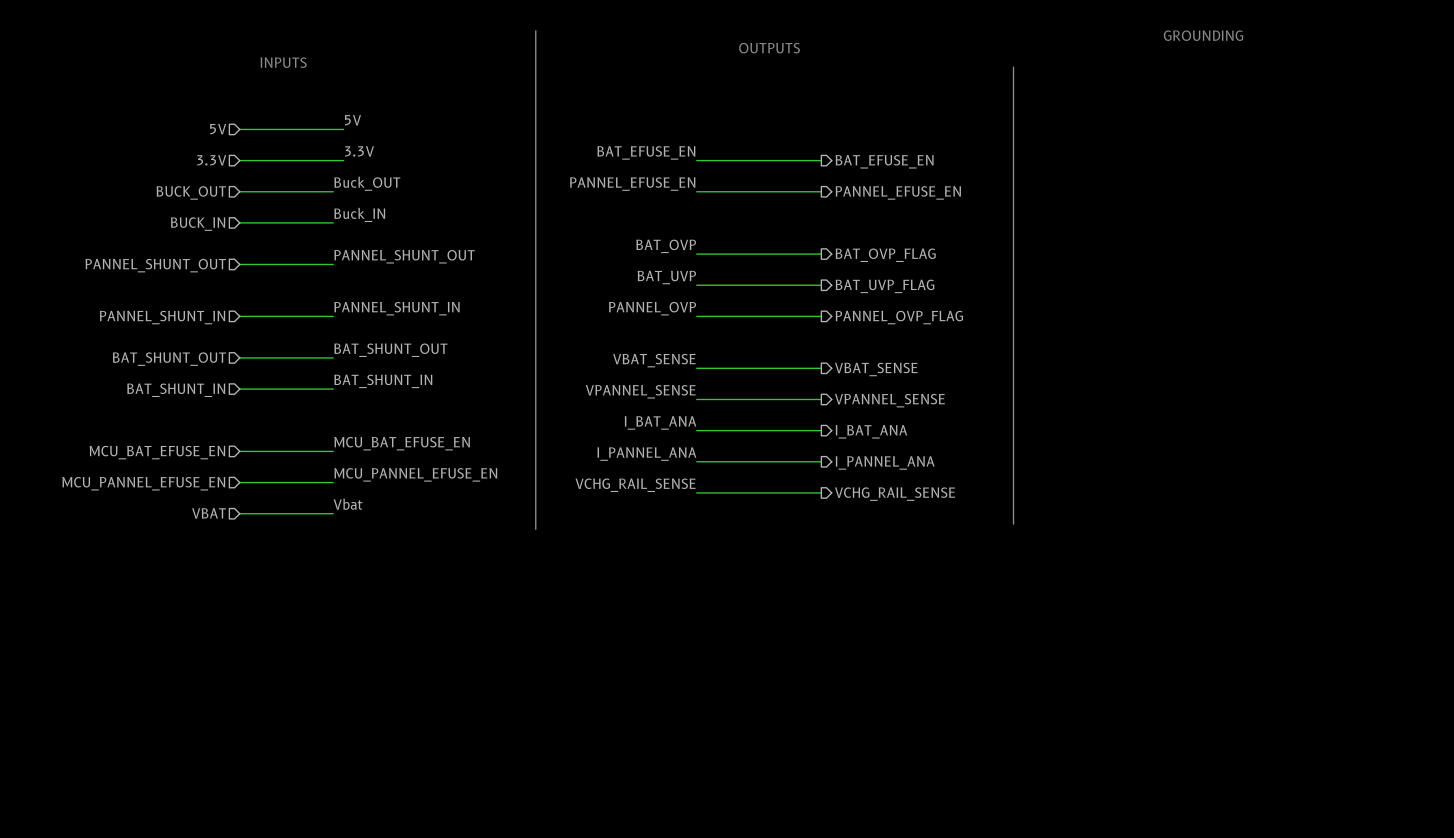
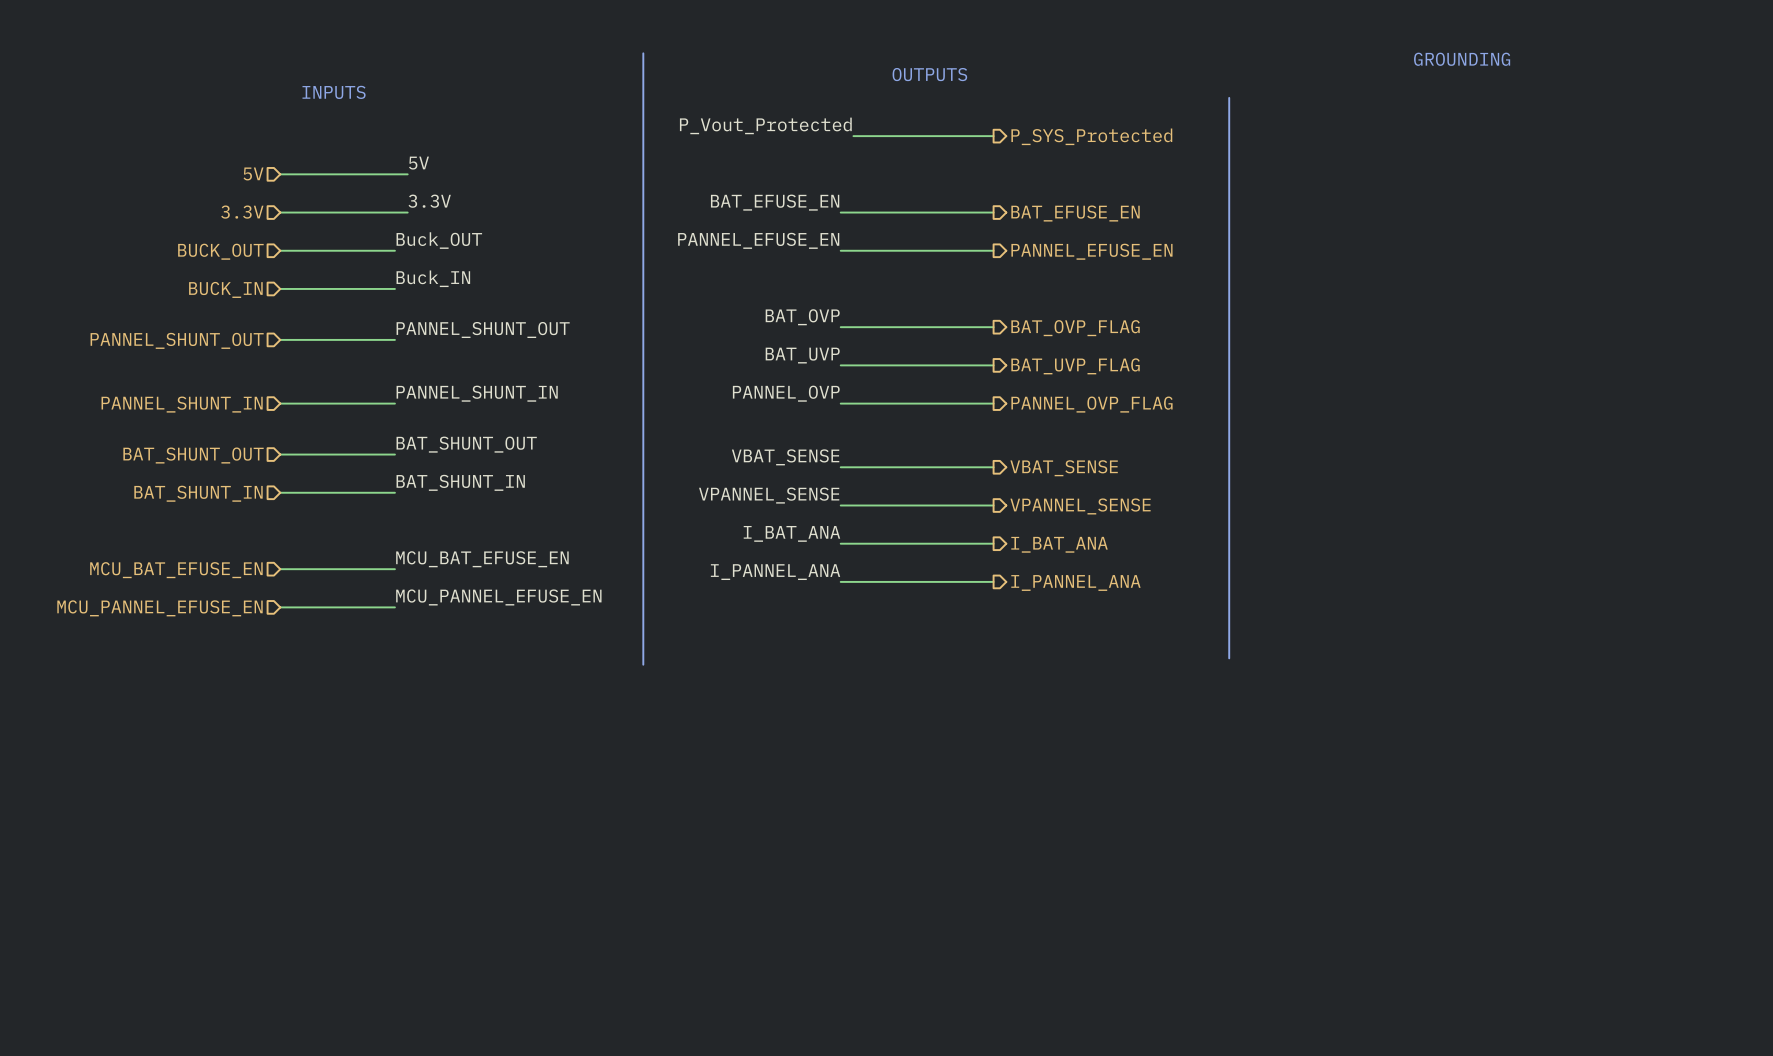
label: none -> P_Vout_Protected (765, 125)
wire: none -> (853, 136) (993, 136)
hierarchical label: none -> P_SYS_Protected (1091, 136)
label: VCHG_RAIL_SENSE (635, 485) -> none
wire: (696, 492) (821, 492) -> none
hierarchical label: VCHG_RAIL_SENSE (895, 494) -> none
label: Vbat (348, 504) -> none
hierarchical label: VBAT (209, 513) -> none
wire: (239, 513) (333, 513) -> none

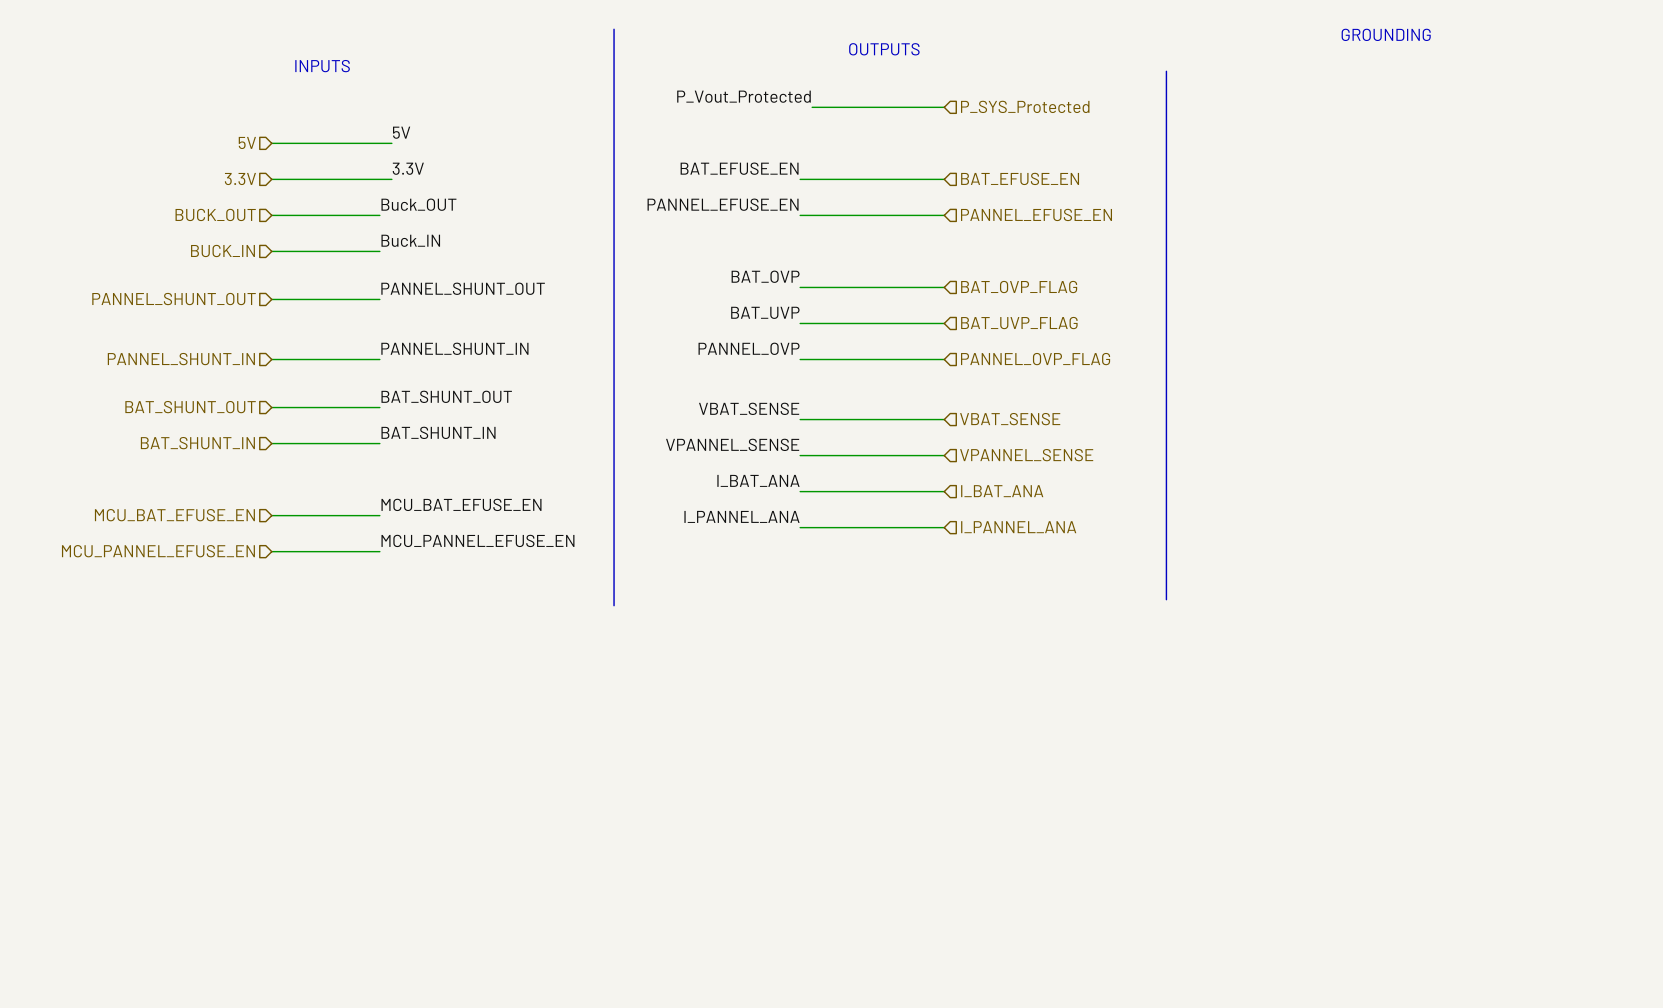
hierarchical label shape: output (1091, 136) -> input (1025, 106)
hierarchical label shape: output (1075, 213) -> input (1020, 178)
hierarchical label shape: output (1091, 251) -> input (1036, 214)
hierarchical label shape: output (1075, 328) -> input (1019, 287)
hierarchical label shape: output (1075, 366) -> input (1019, 323)
hierarchical label shape: output (1091, 404) -> input (1035, 359)
hierarchical label shape: output (1064, 468) -> input (1010, 419)
hierarchical label shape: output (1080, 506) -> input (1026, 455)
hierarchical label shape: output (1059, 544) -> input (1002, 491)
hierarchical label shape: output (1075, 582) -> input (1018, 527)

